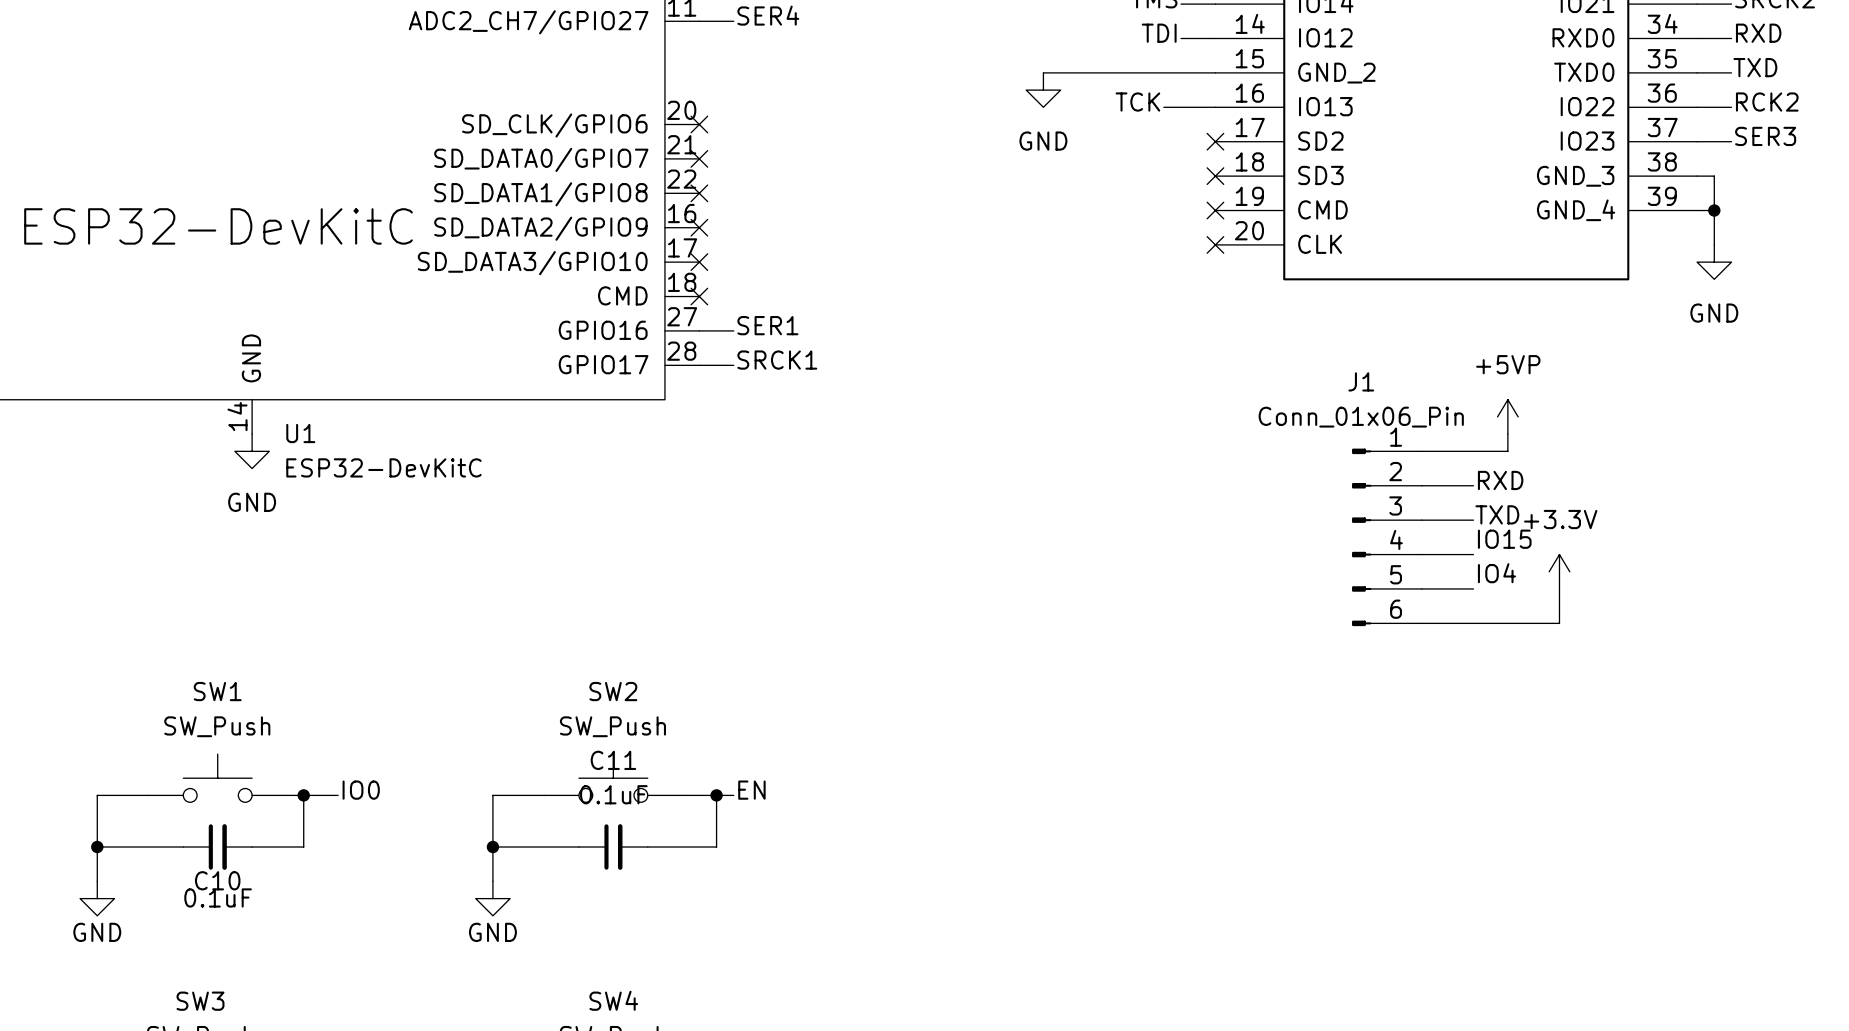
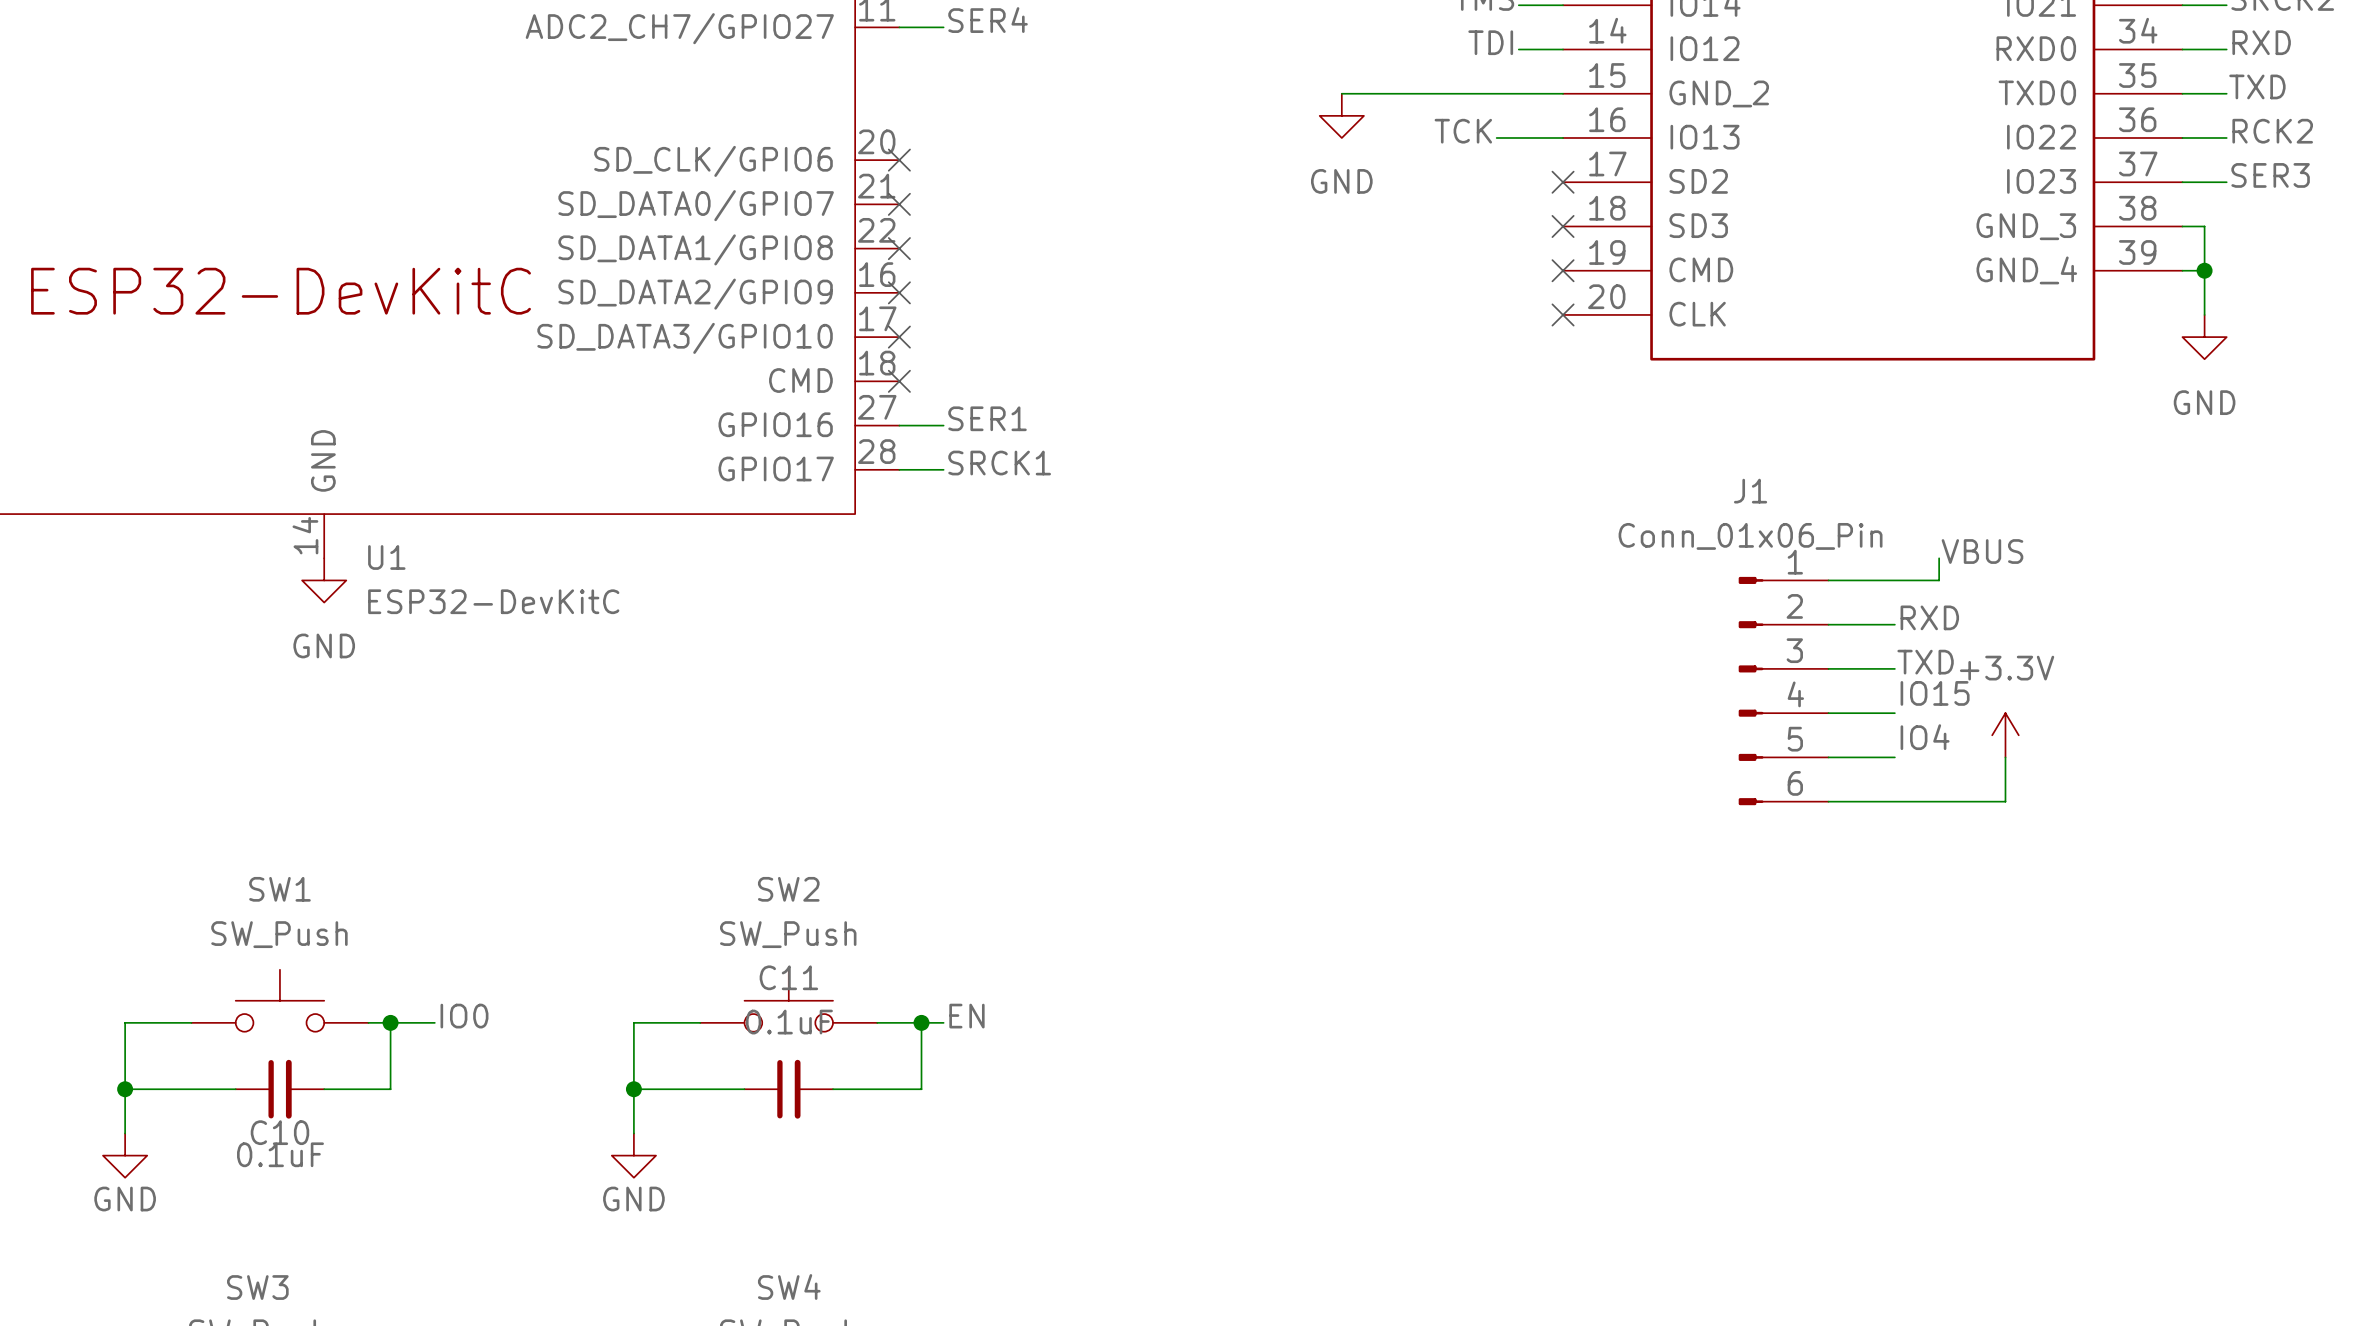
power symbol: +5VP (1507, 416) -> none
label: none -> VBUS (1982, 551)

